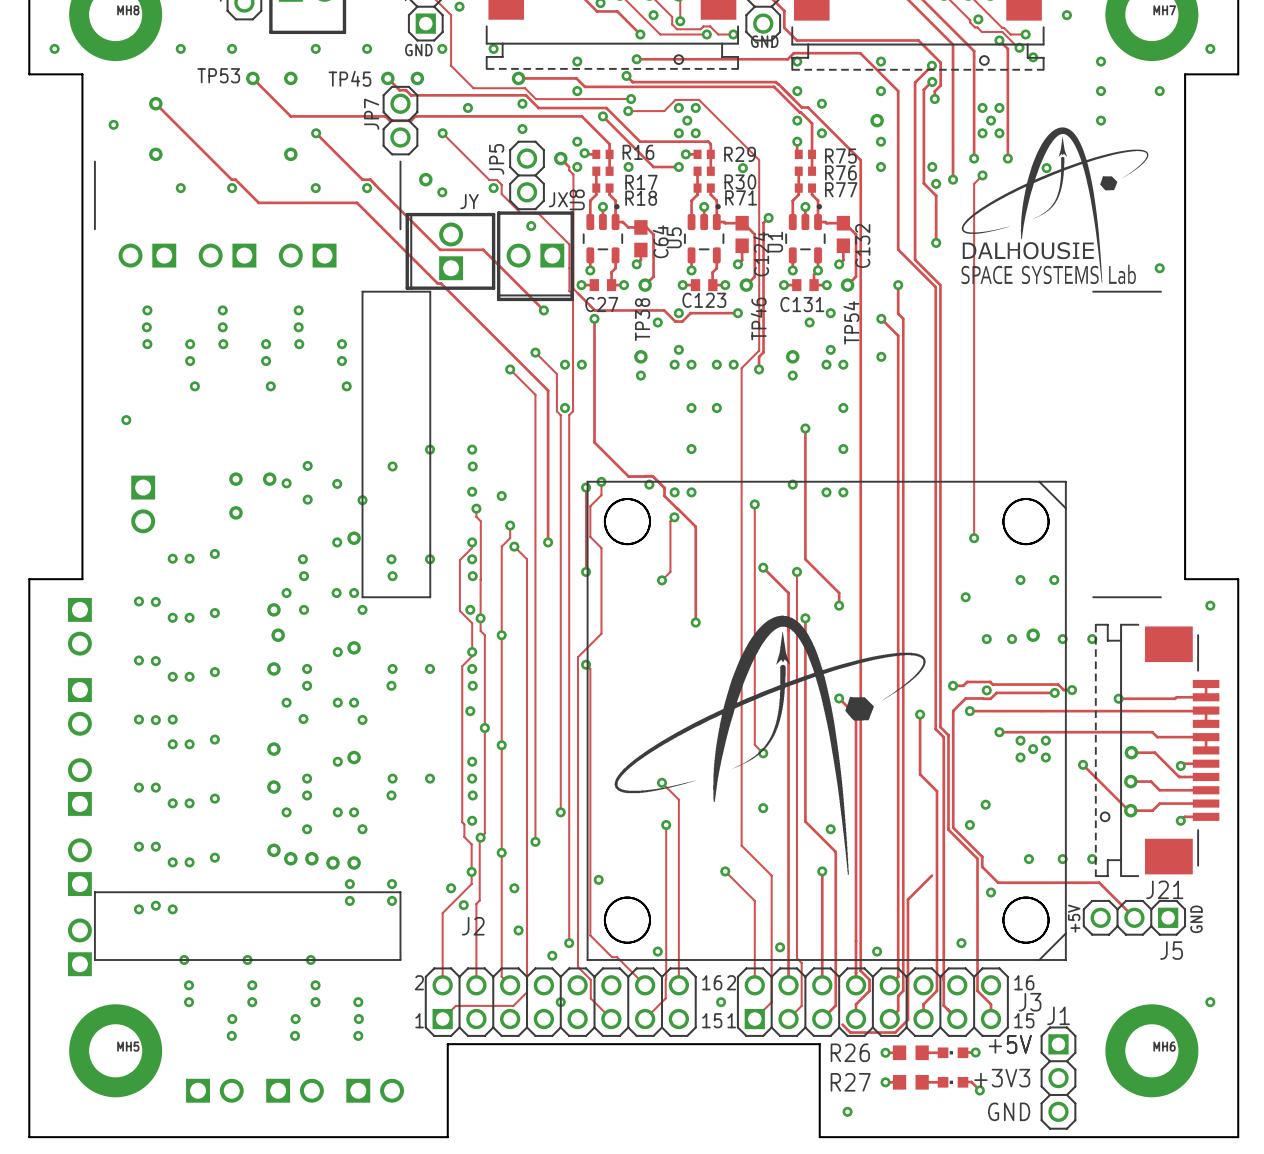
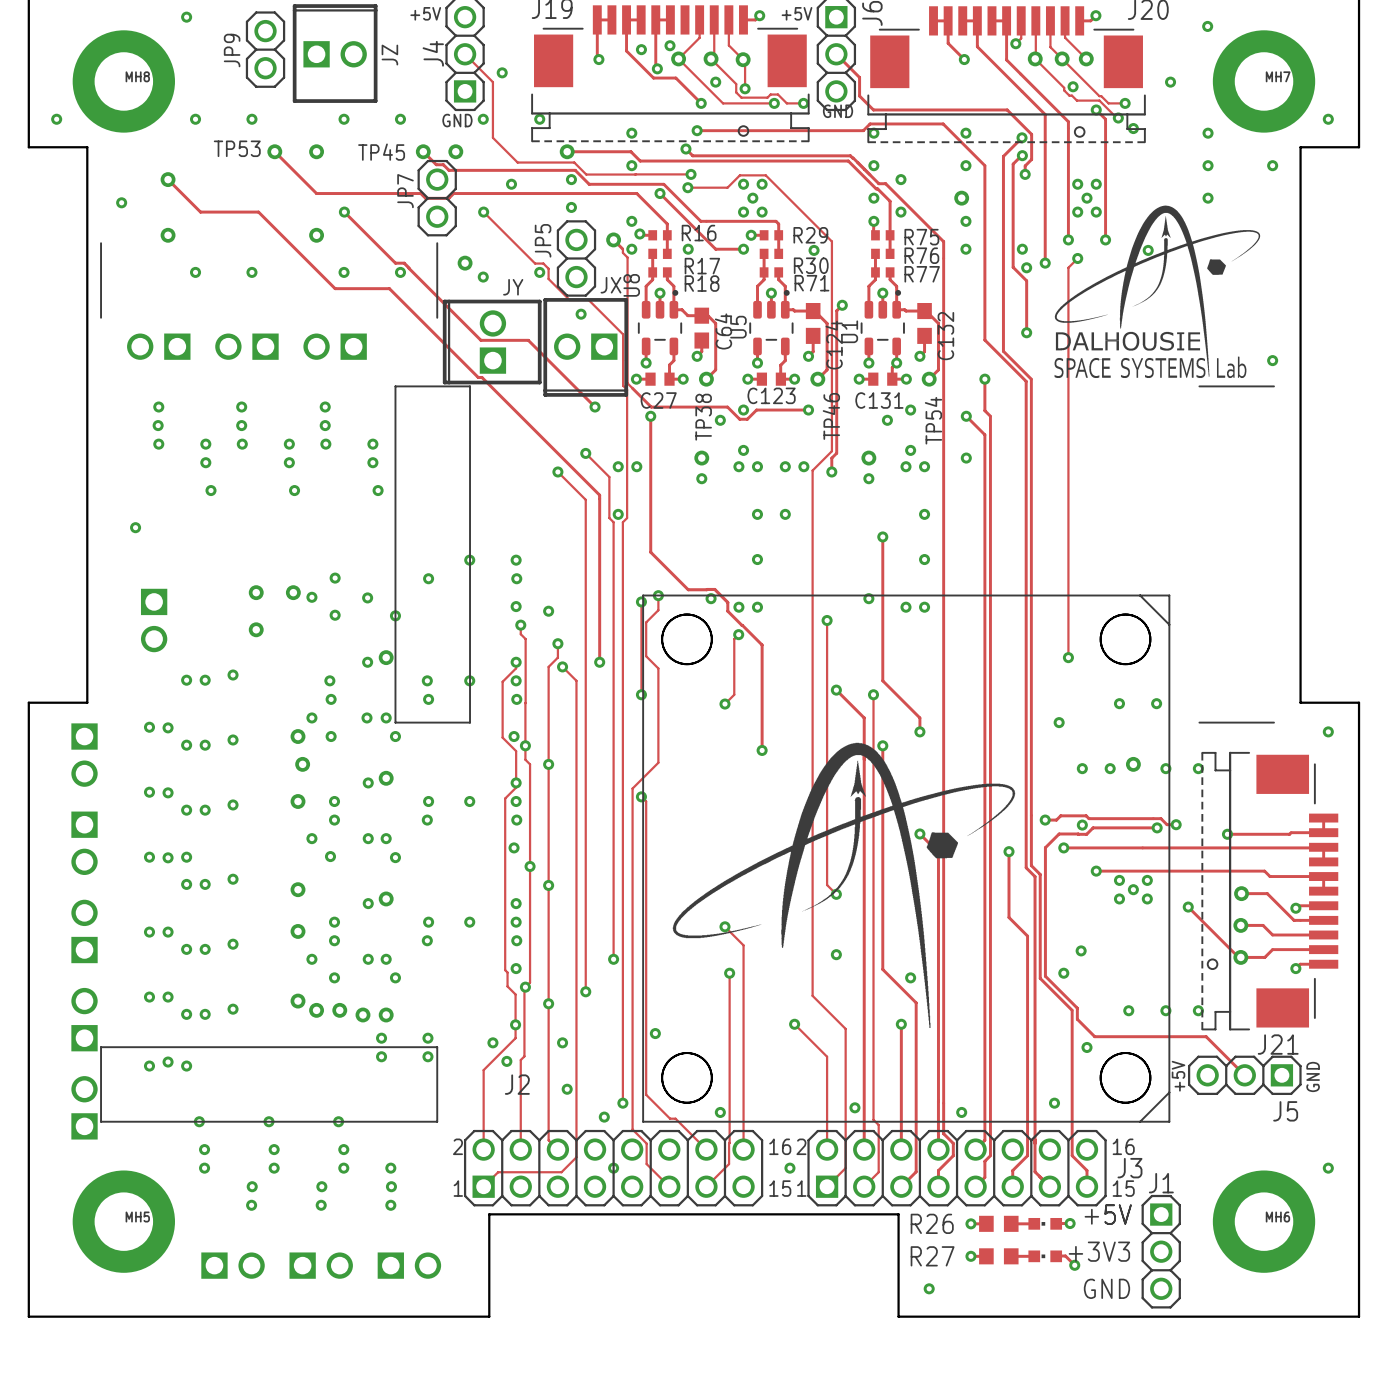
track: (185, 133) (231, 179) (235, 179) (258, 202) (307, 202) -> (200, 212) (258, 212) (335, 288)
track: (931, 875) (907, 899) (907, 1019) (895, 1032) (850, 1032) (842, 1024) -> none

